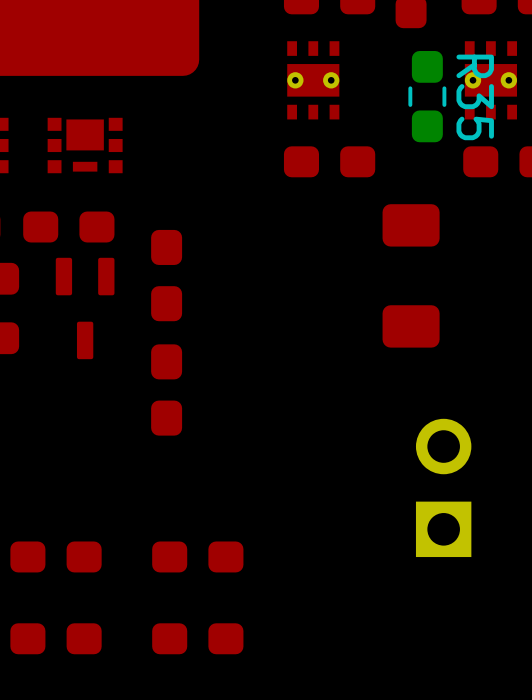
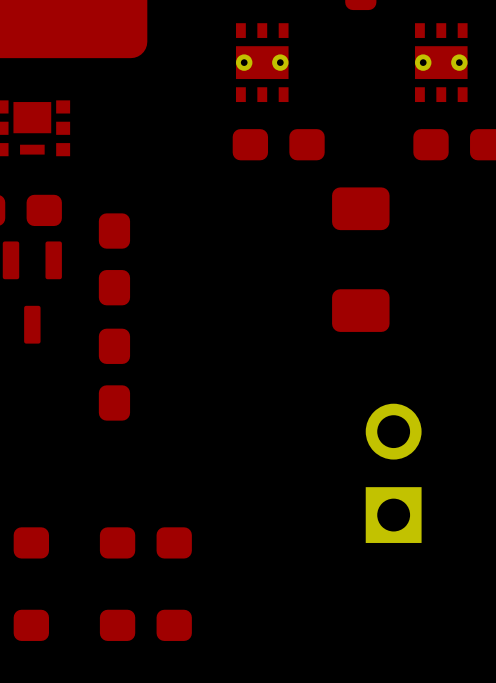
R35: (427, 96) -> none

